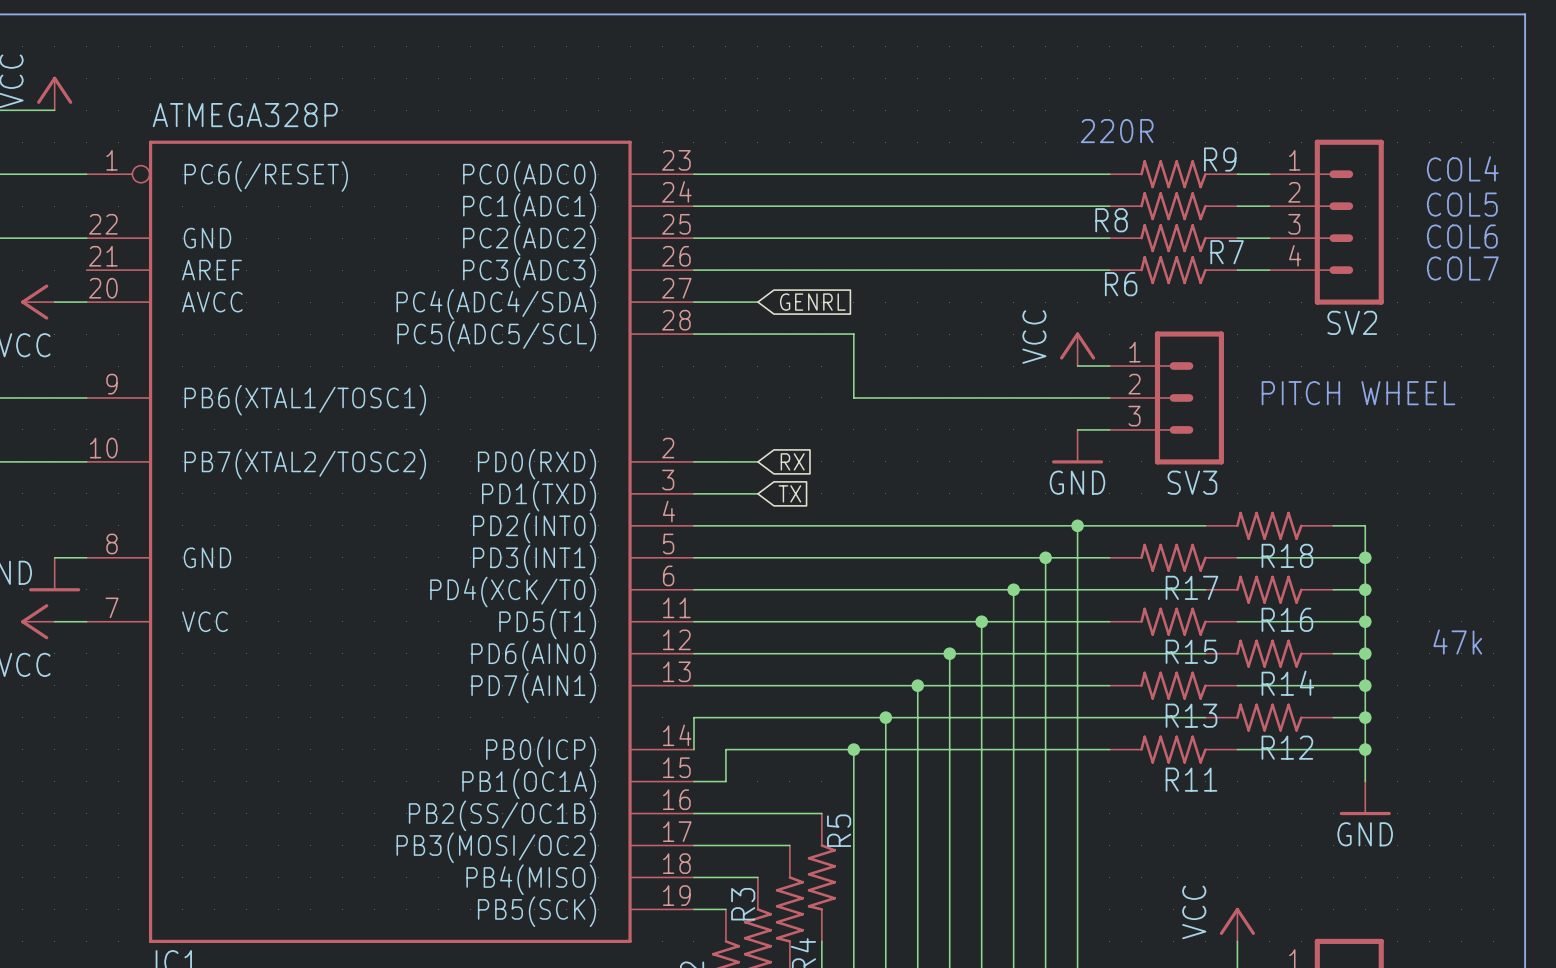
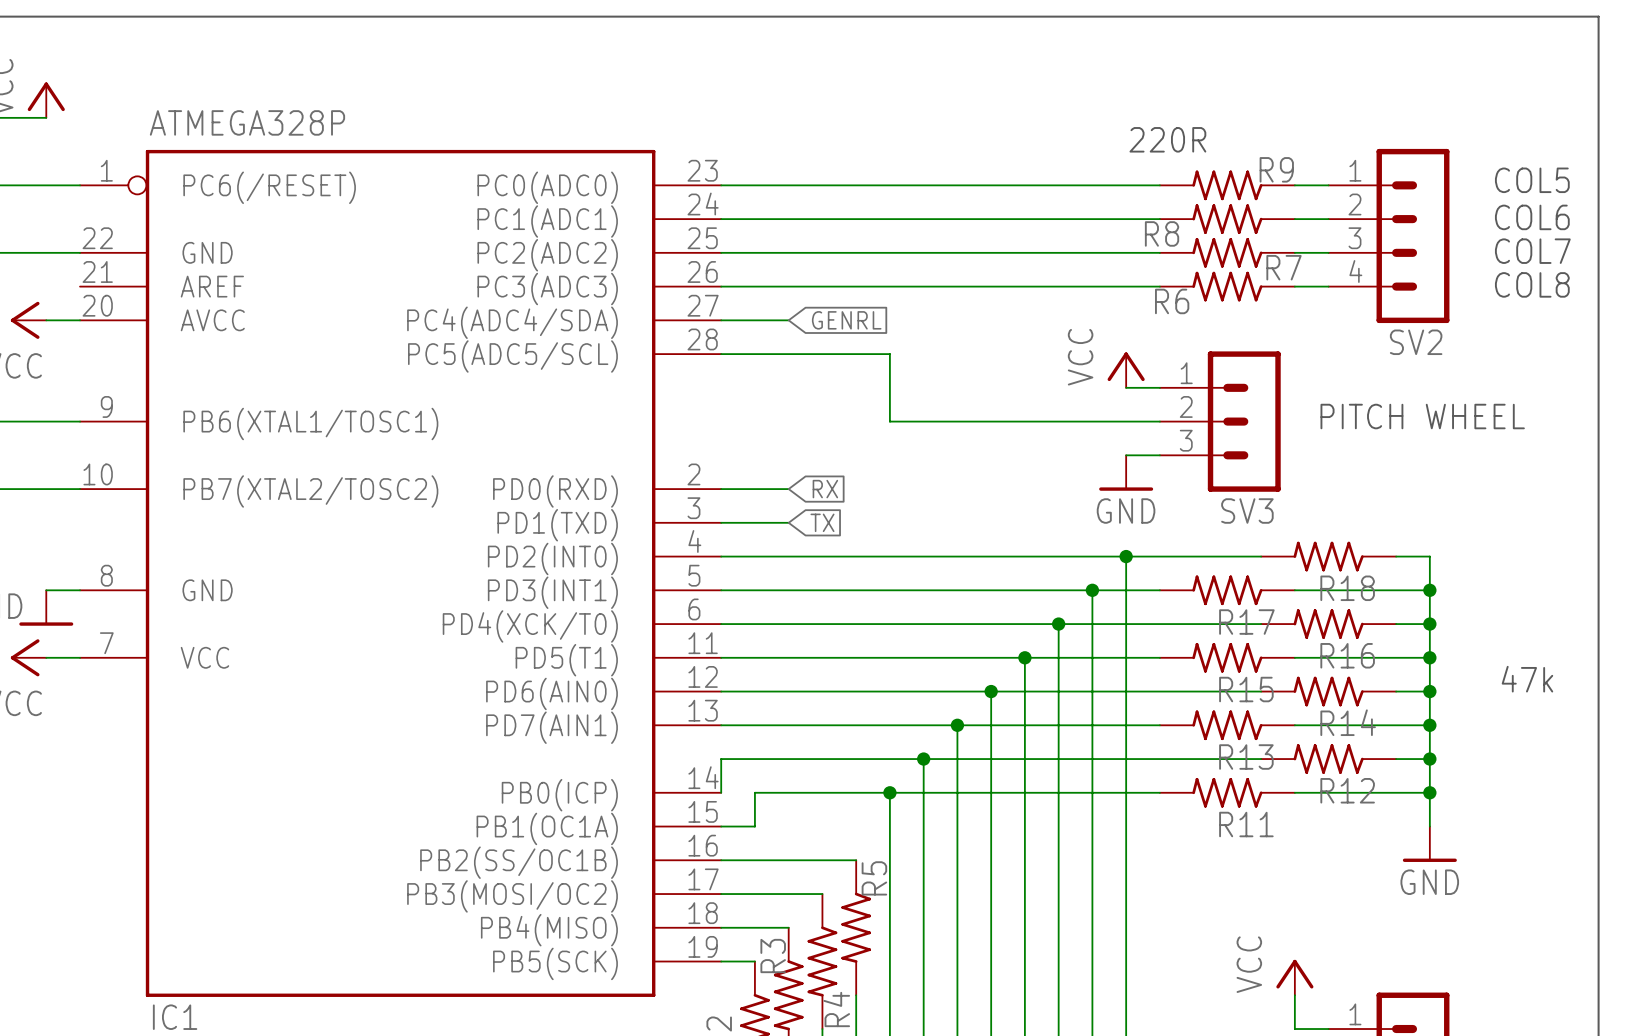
text: COL4 (1462, 168) -> COL5 (1532, 180)
text: COL5 (1462, 204) -> COL6 (1532, 217)
text: COL6 (1462, 236) -> COL7 (1532, 251)
text: COL7 (1462, 268) -> COL8 (1532, 284)

